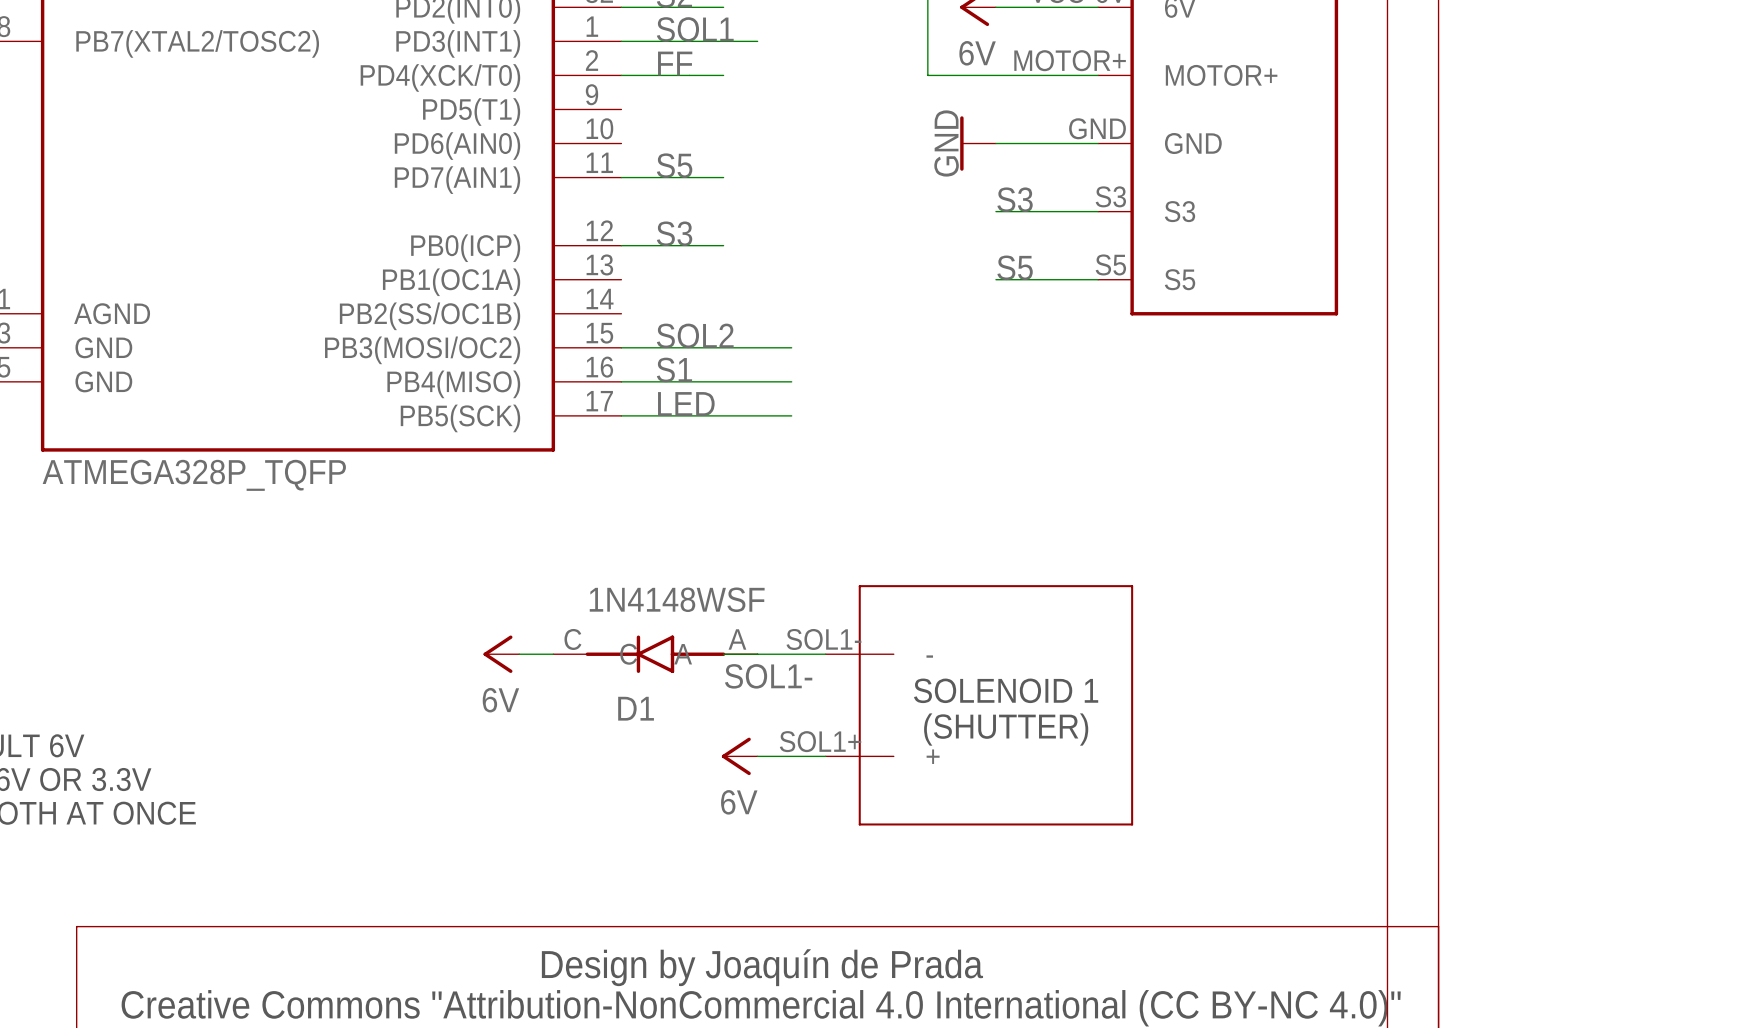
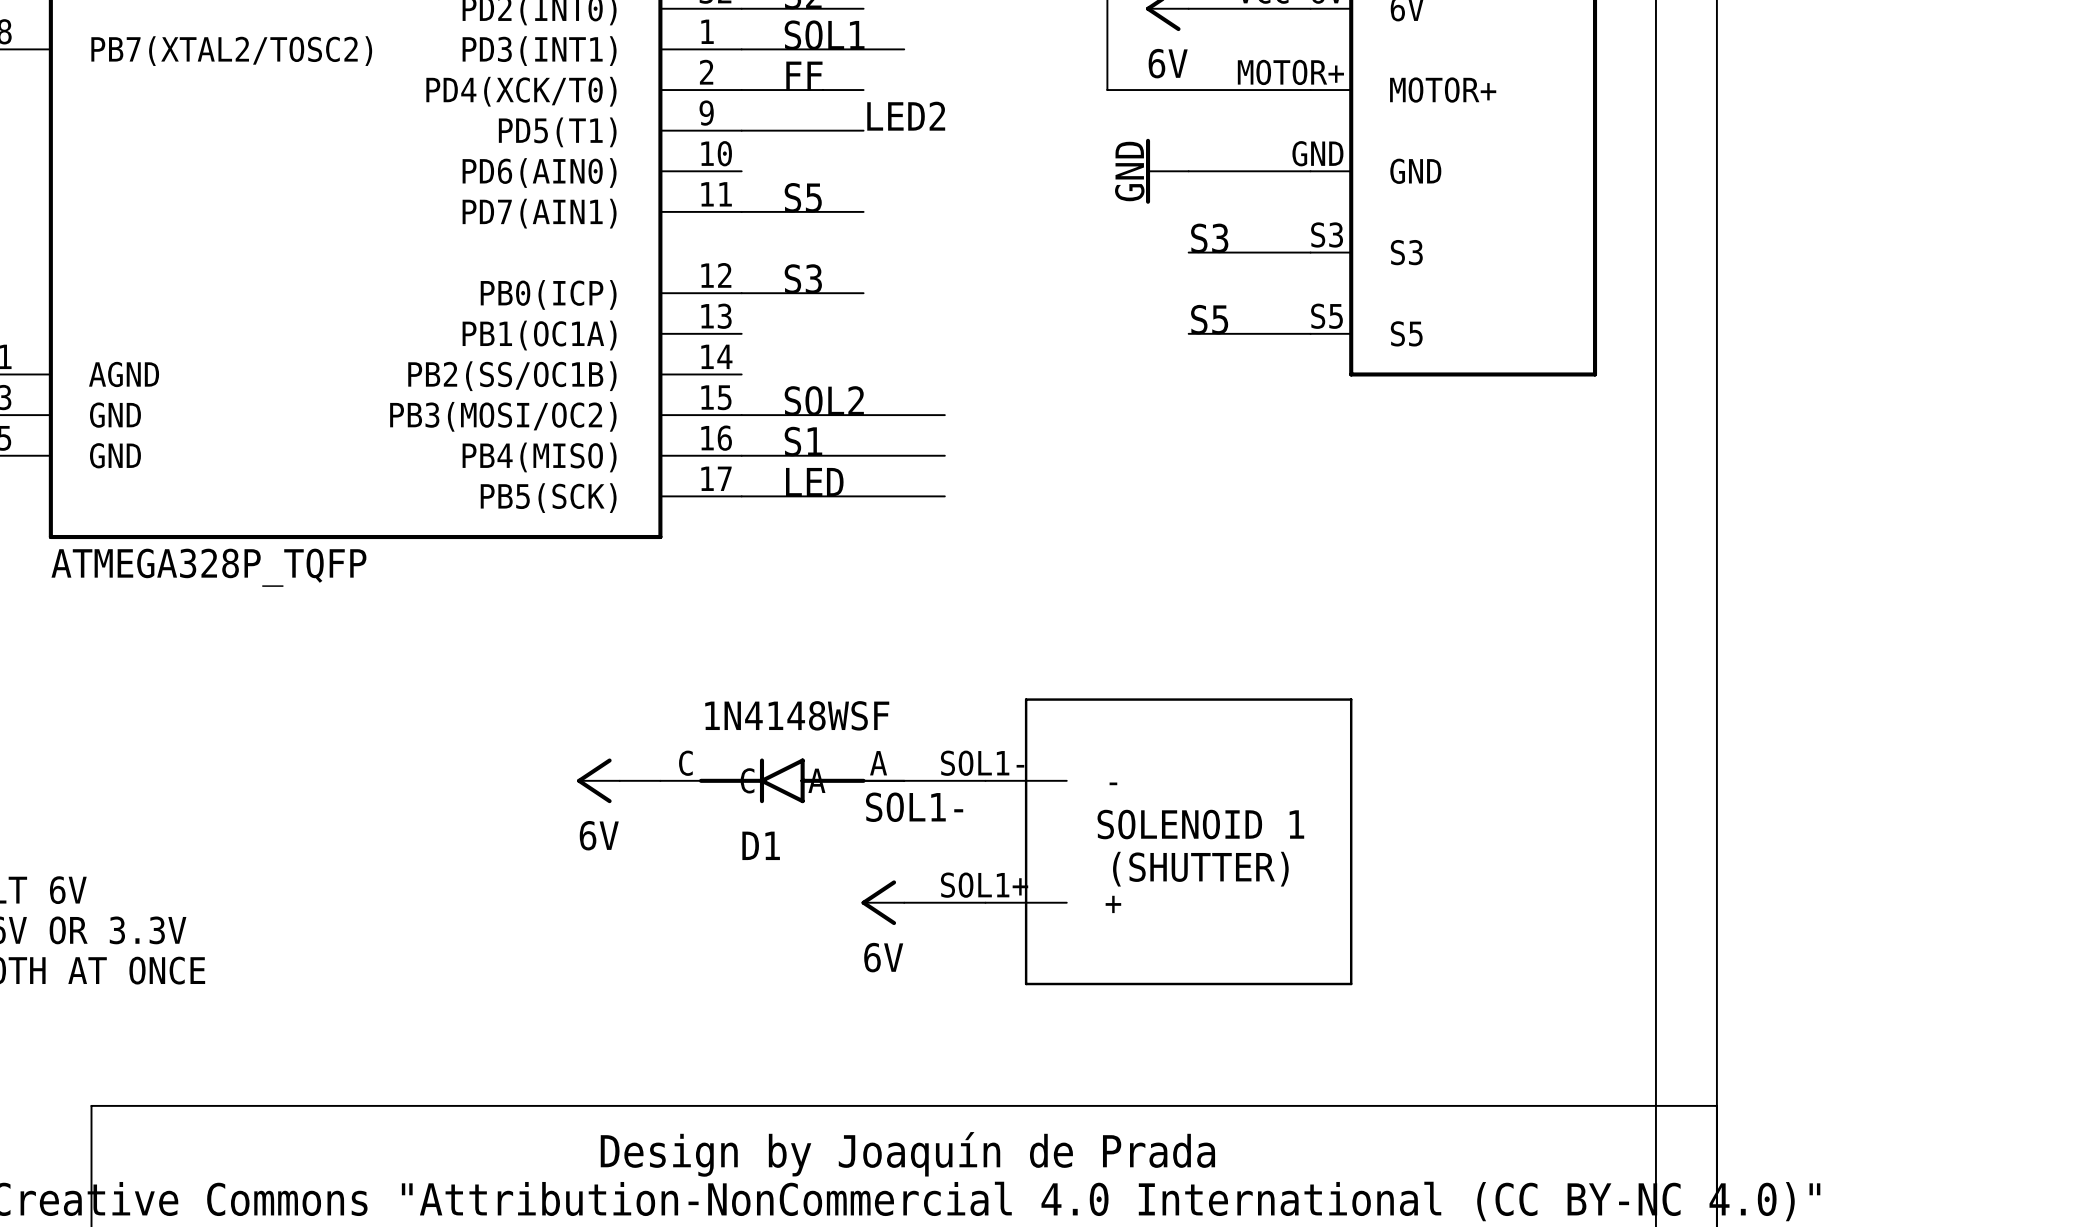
label: none -> LED2 (906, 116)
wire: none -> (741, 130) (863, 130)

